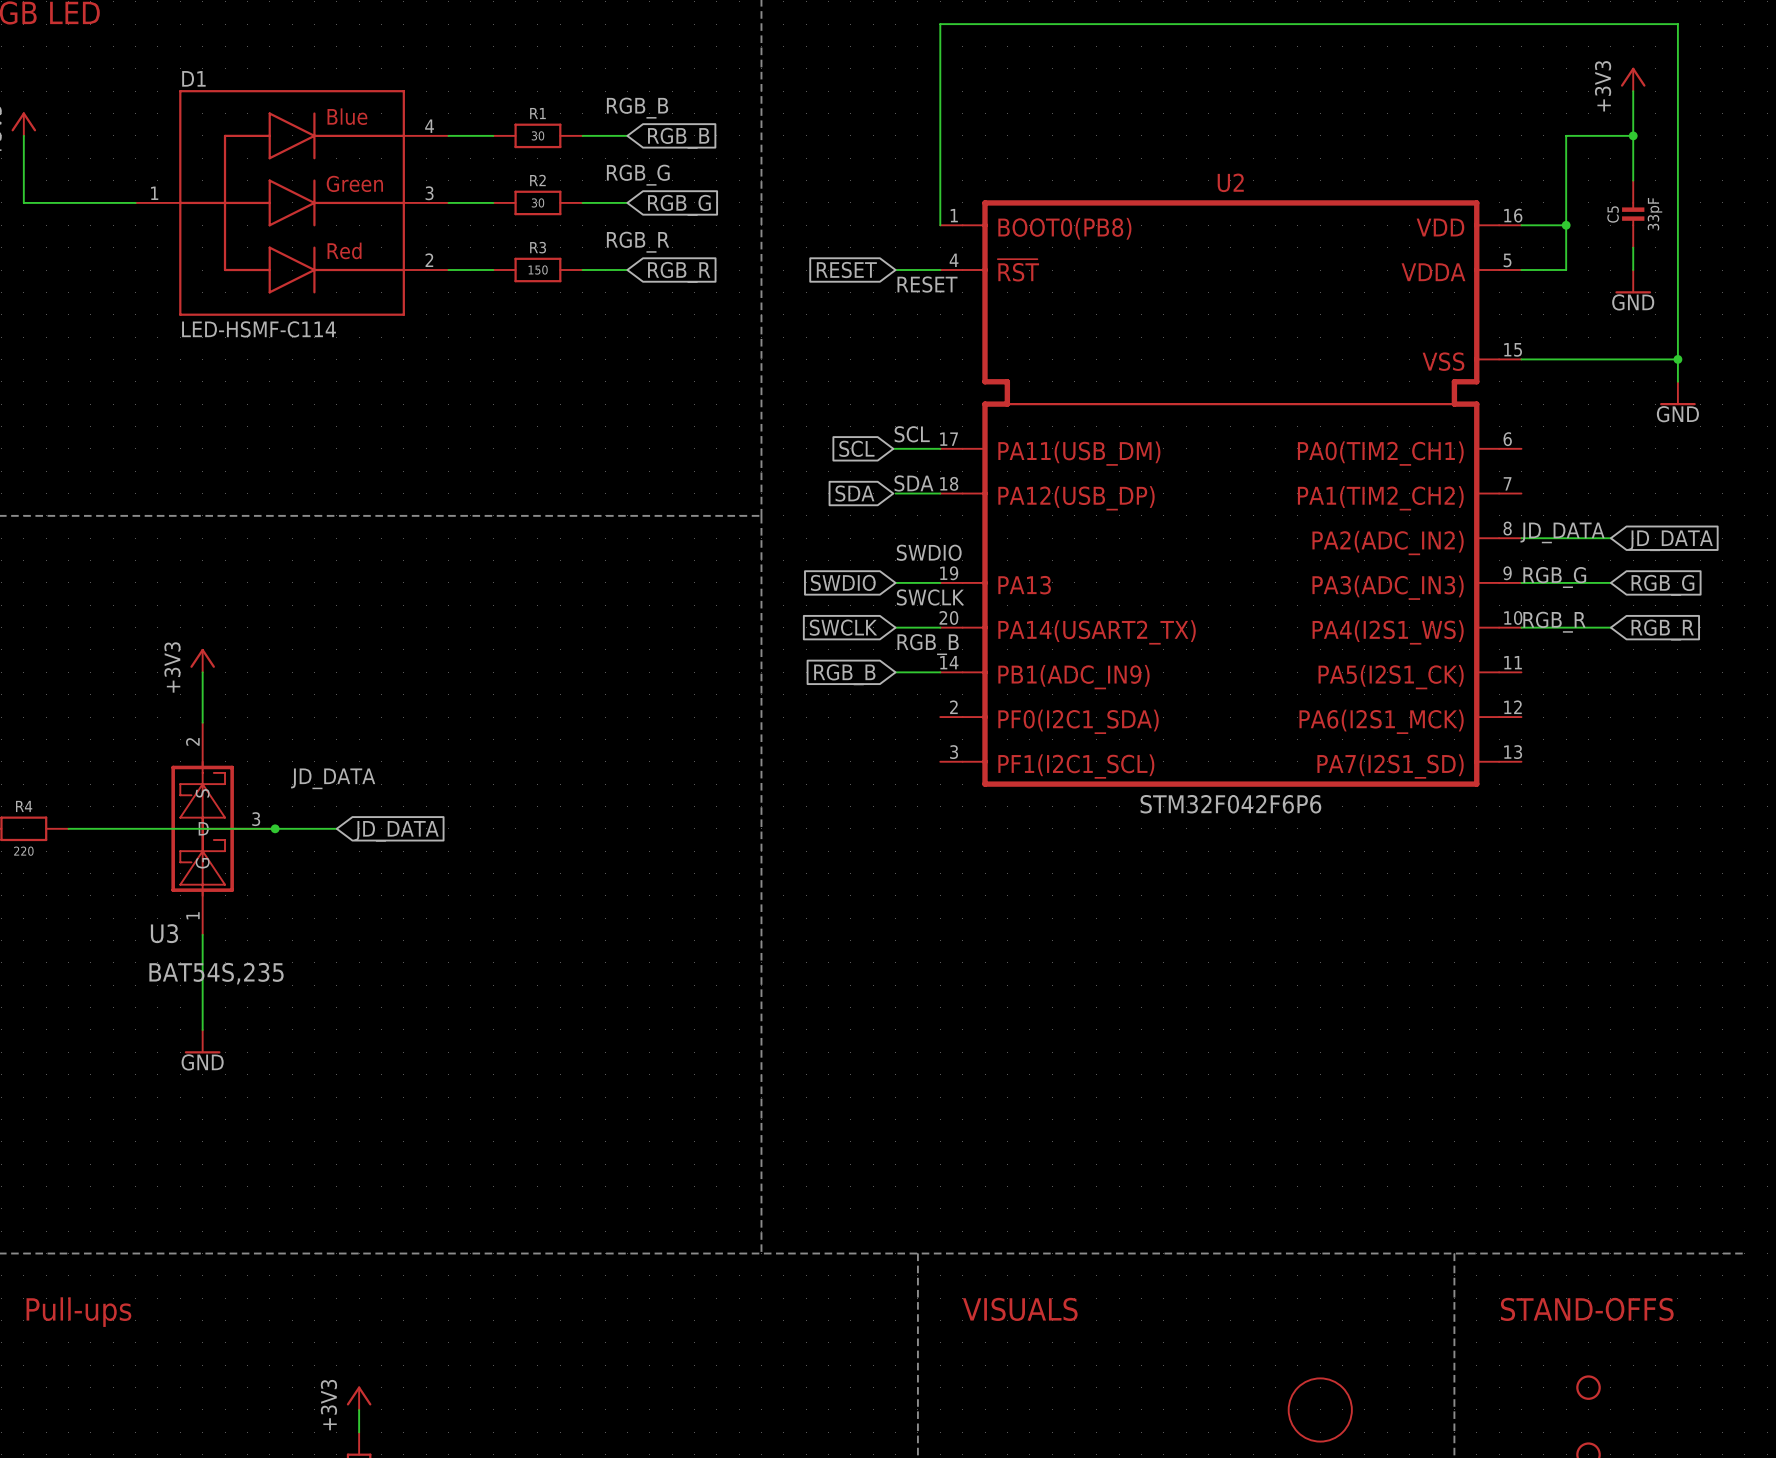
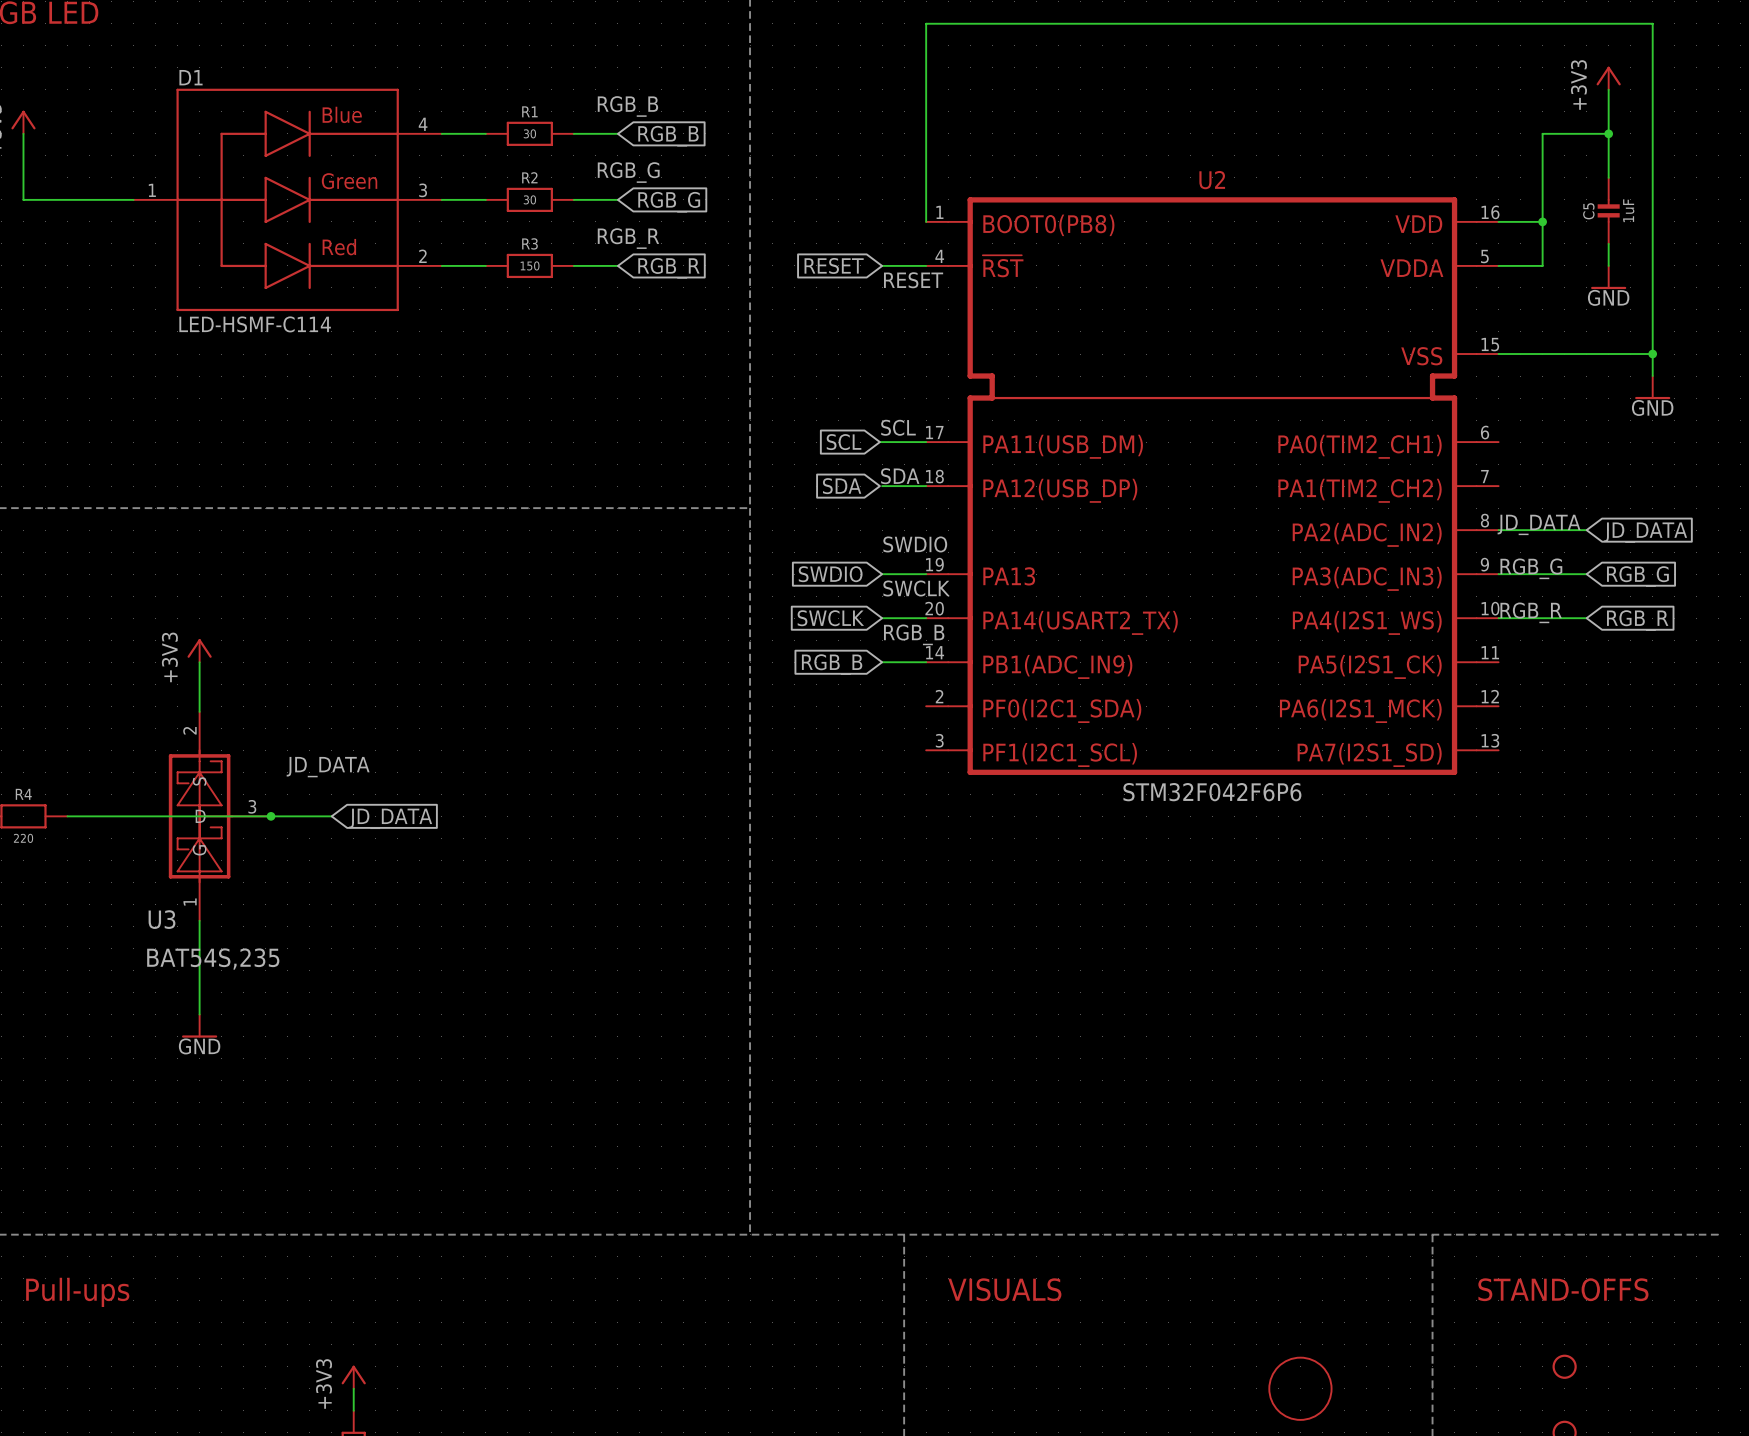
C5 value: 33pF (1654, 214) -> 1uF (1628, 210)

